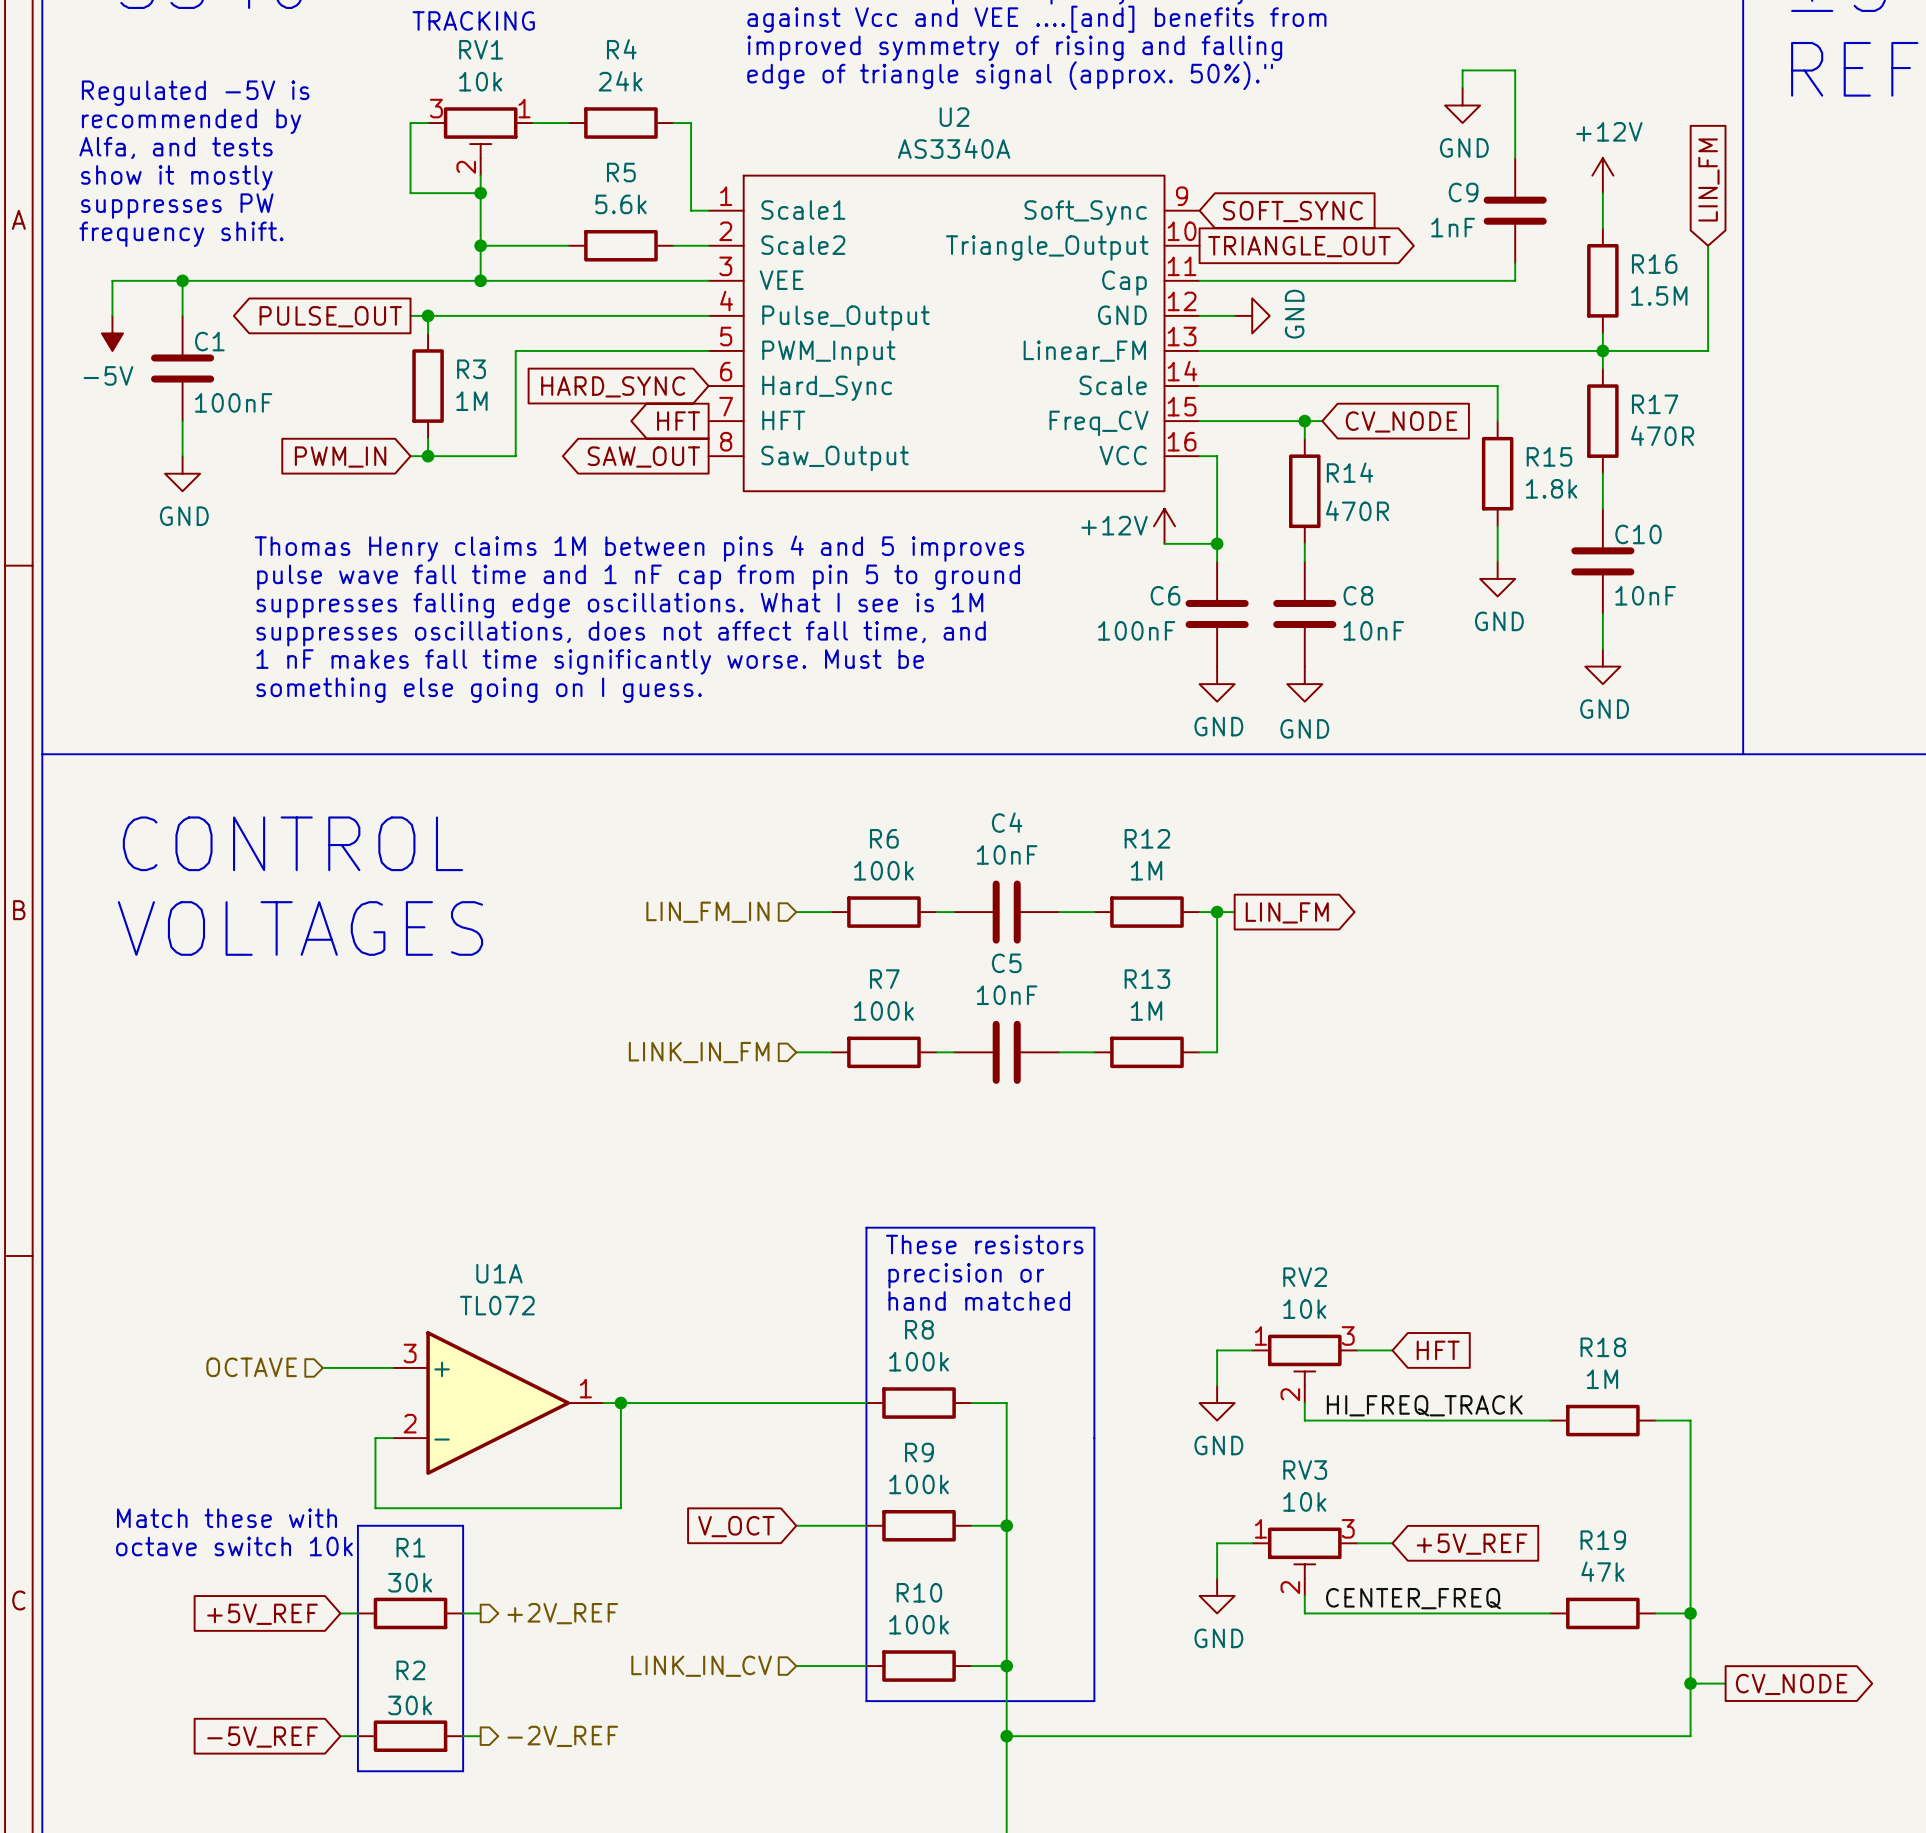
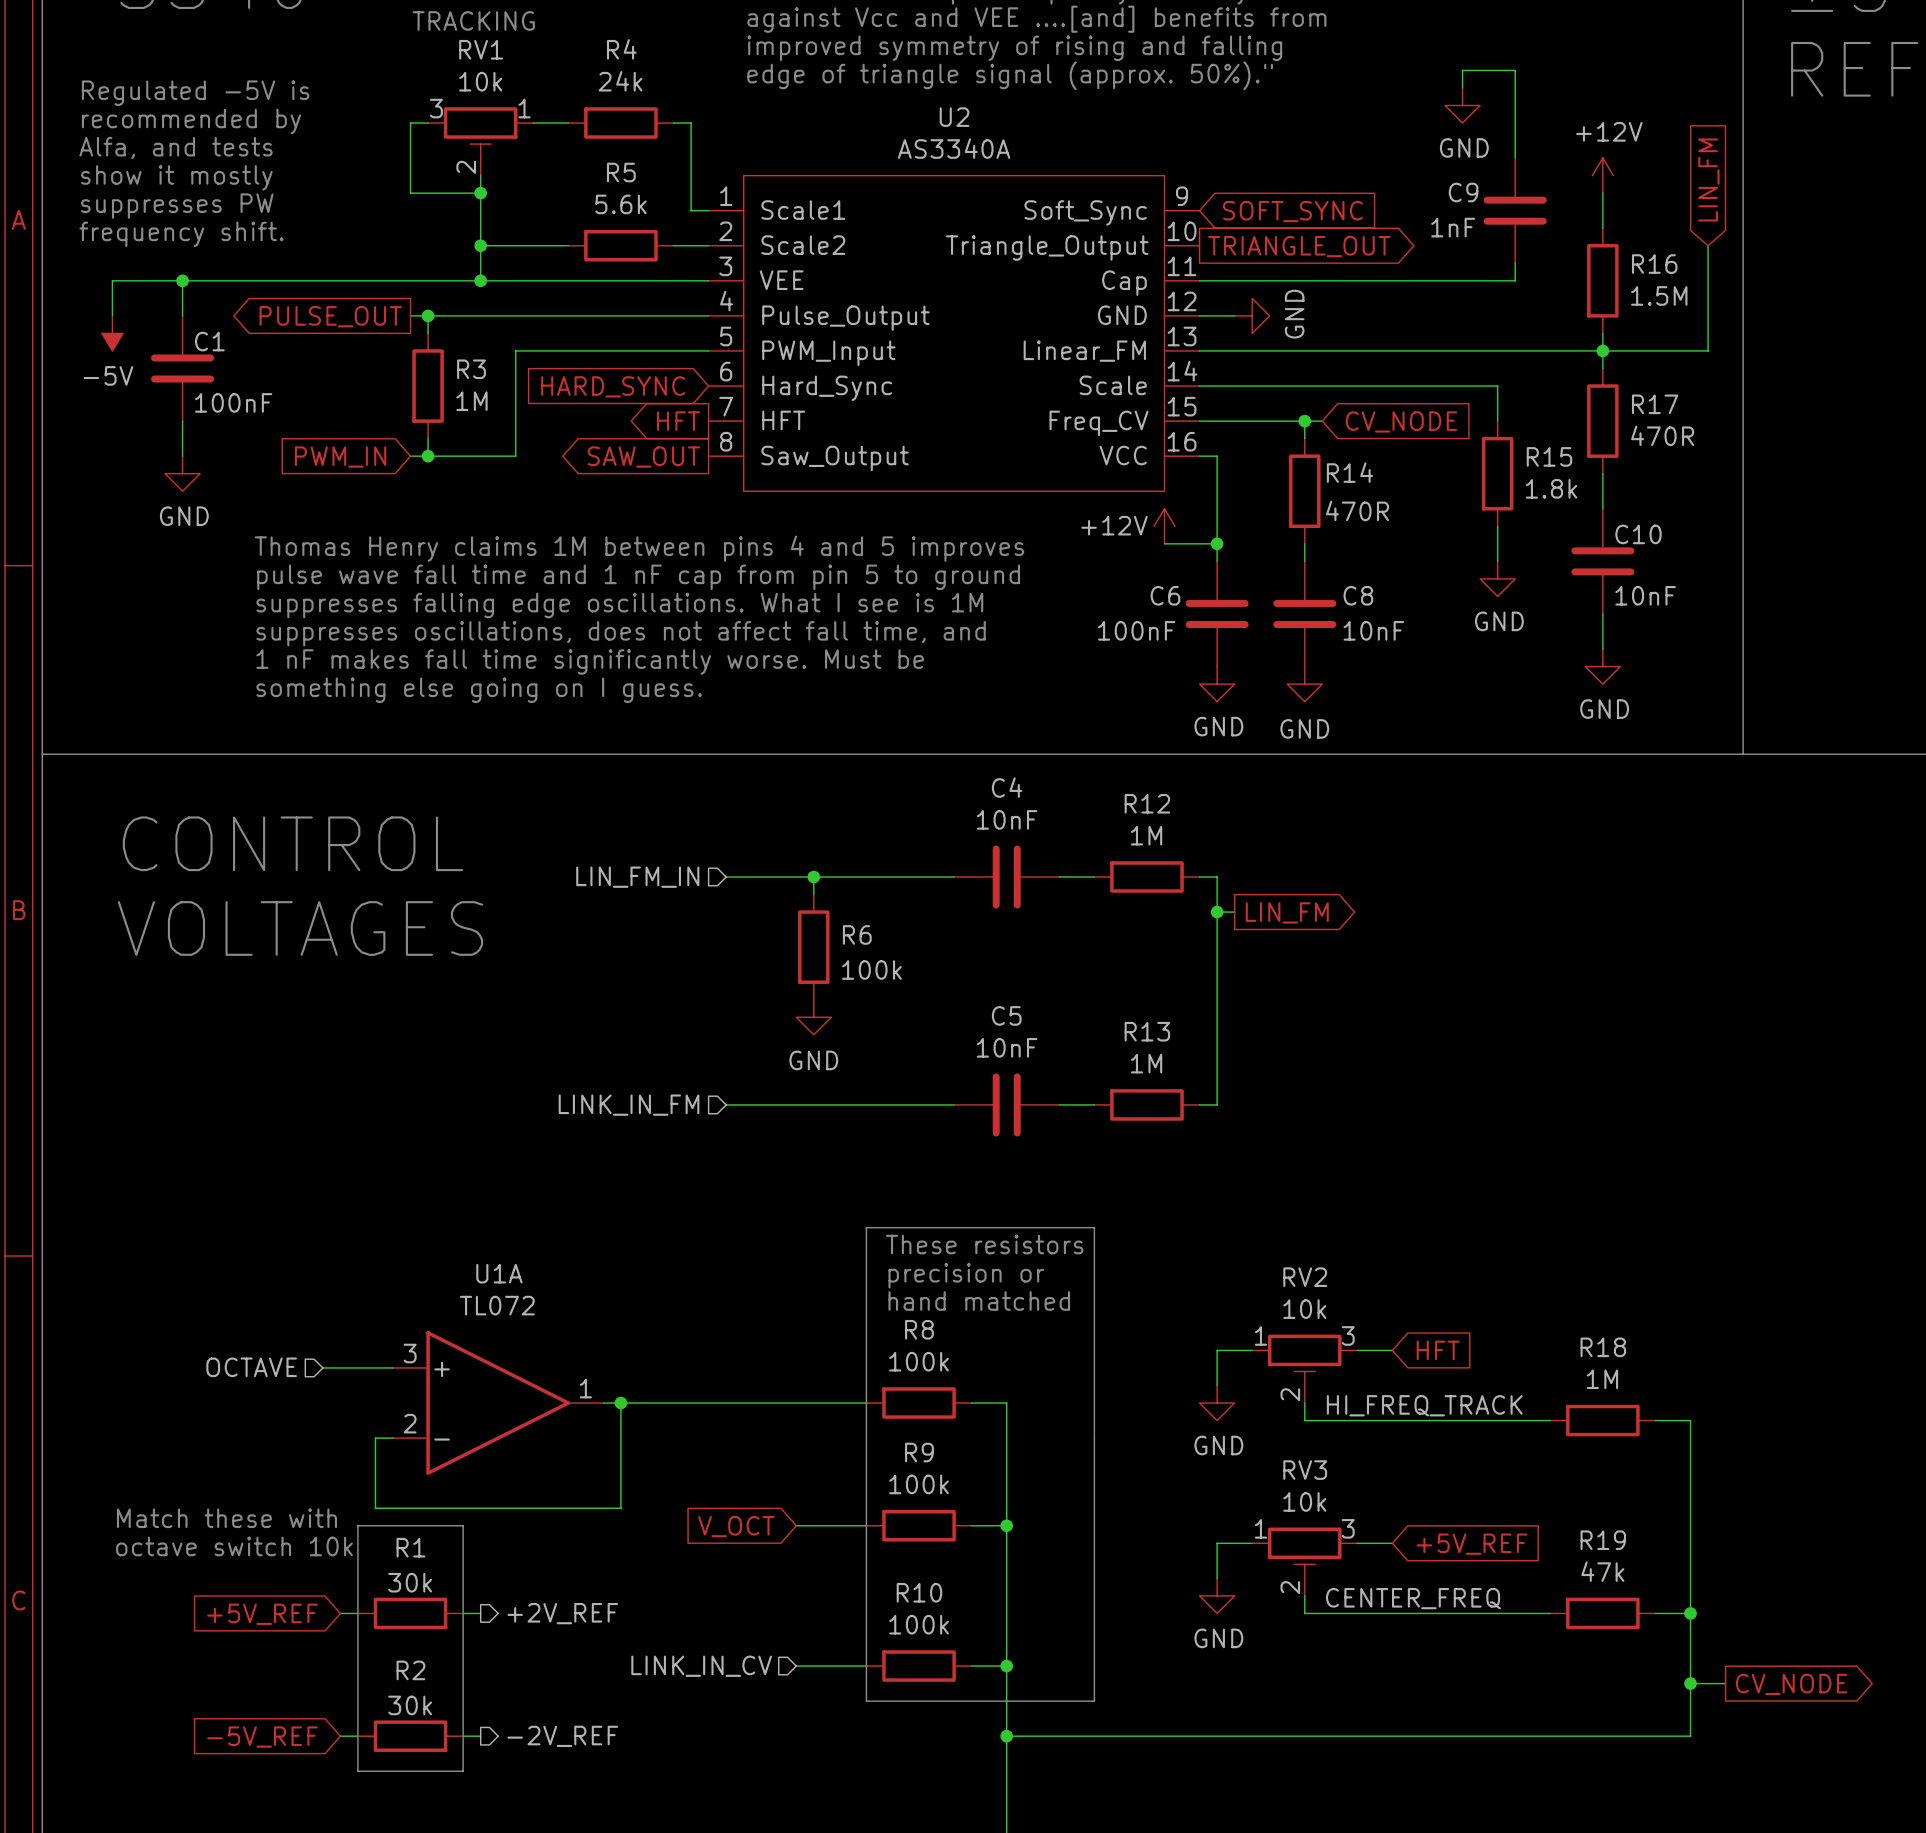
R6 name position: R6 (884, 838) -> R6 (857, 934)
R6 value position: 100k (883, 870) -> 100k (871, 969)
wire: none -> (726, 877) (954, 877)
wire: none -> (813, 877) (813, 894)
junction: none -> (813, 877)
hierarchical label position: LIN_FM_IN (707, 912) -> LIN_FM_IN (637, 877)
R6 rotation: 0° (883, 912) -> 90° clockwise (813, 947)
R6 position: (883, 912) -> (813, 947)
wire: (936, 912) (954, 912) -> none
C4 position: (1006, 912) -> (1006, 877)
wire: (1059, 912) (1094, 912) -> (1059, 877) (1094, 877)
R12 position: (1146, 912) -> (1146, 877)
wire: (1199, 912) (1217, 912) -> (1199, 877) (1217, 877) (1217, 912)
power symbol: none -> GND (813, 1017)
hierarchical label position: LINK_IN_FM (699, 1052) -> LINK_IN_FM (629, 1105)
wire: (796, 1052) (831, 1052) -> none
R7: 100k (883, 1052) -> none
wire: (936, 1052) (954, 1052) -> none
C5 position: (1006, 1052) -> (1006, 1104)
wire: (1059, 1052) (1094, 1052) -> (1059, 1104) (1094, 1104)
R13 position: (1146, 1052) -> (1146, 1104)
wire: (1199, 1052) (1217, 1052) -> (1199, 1104) (1217, 1104) (1217, 1052)
wire: none -> (726, 1104) (954, 1104)

